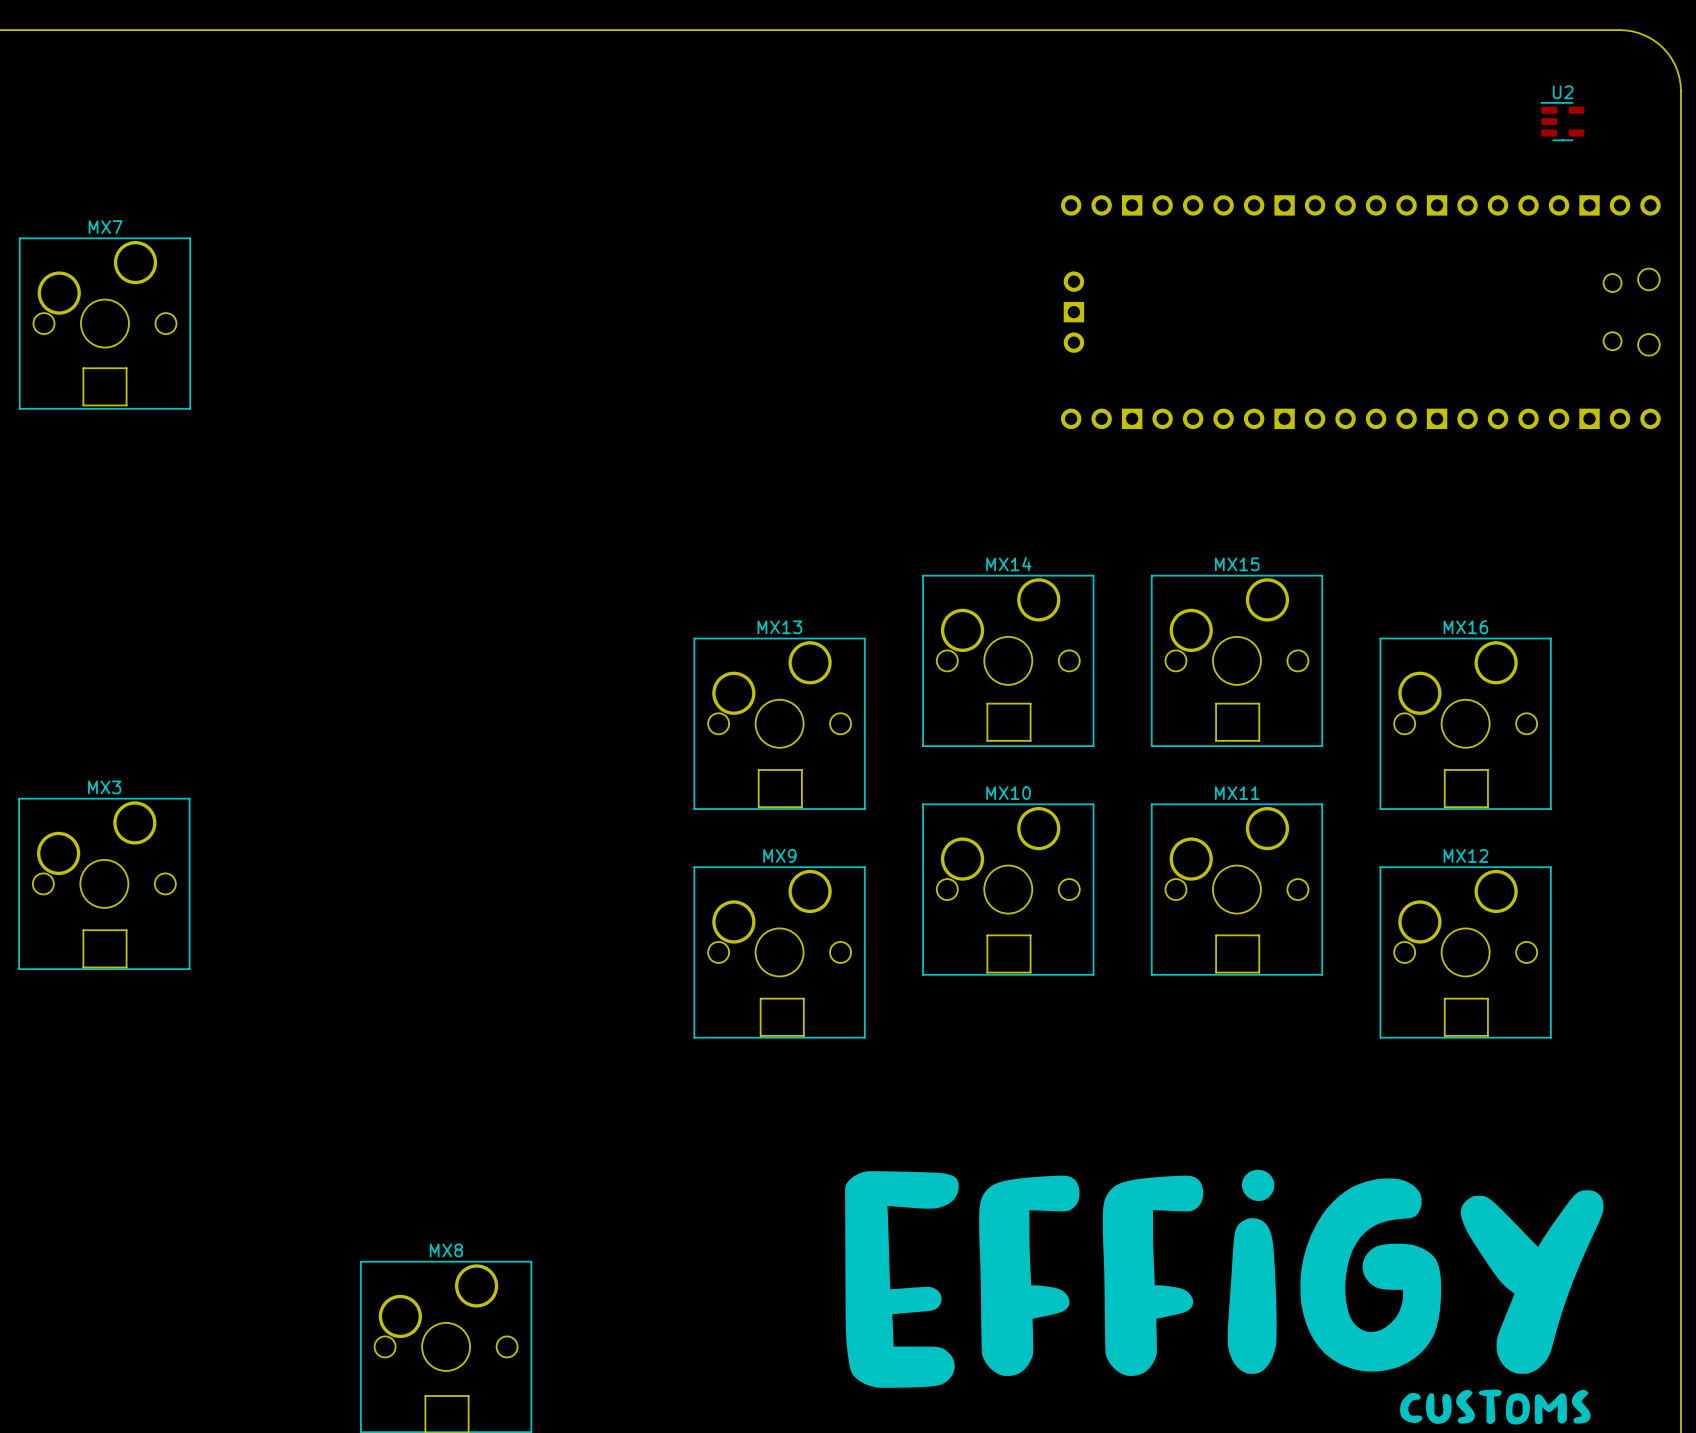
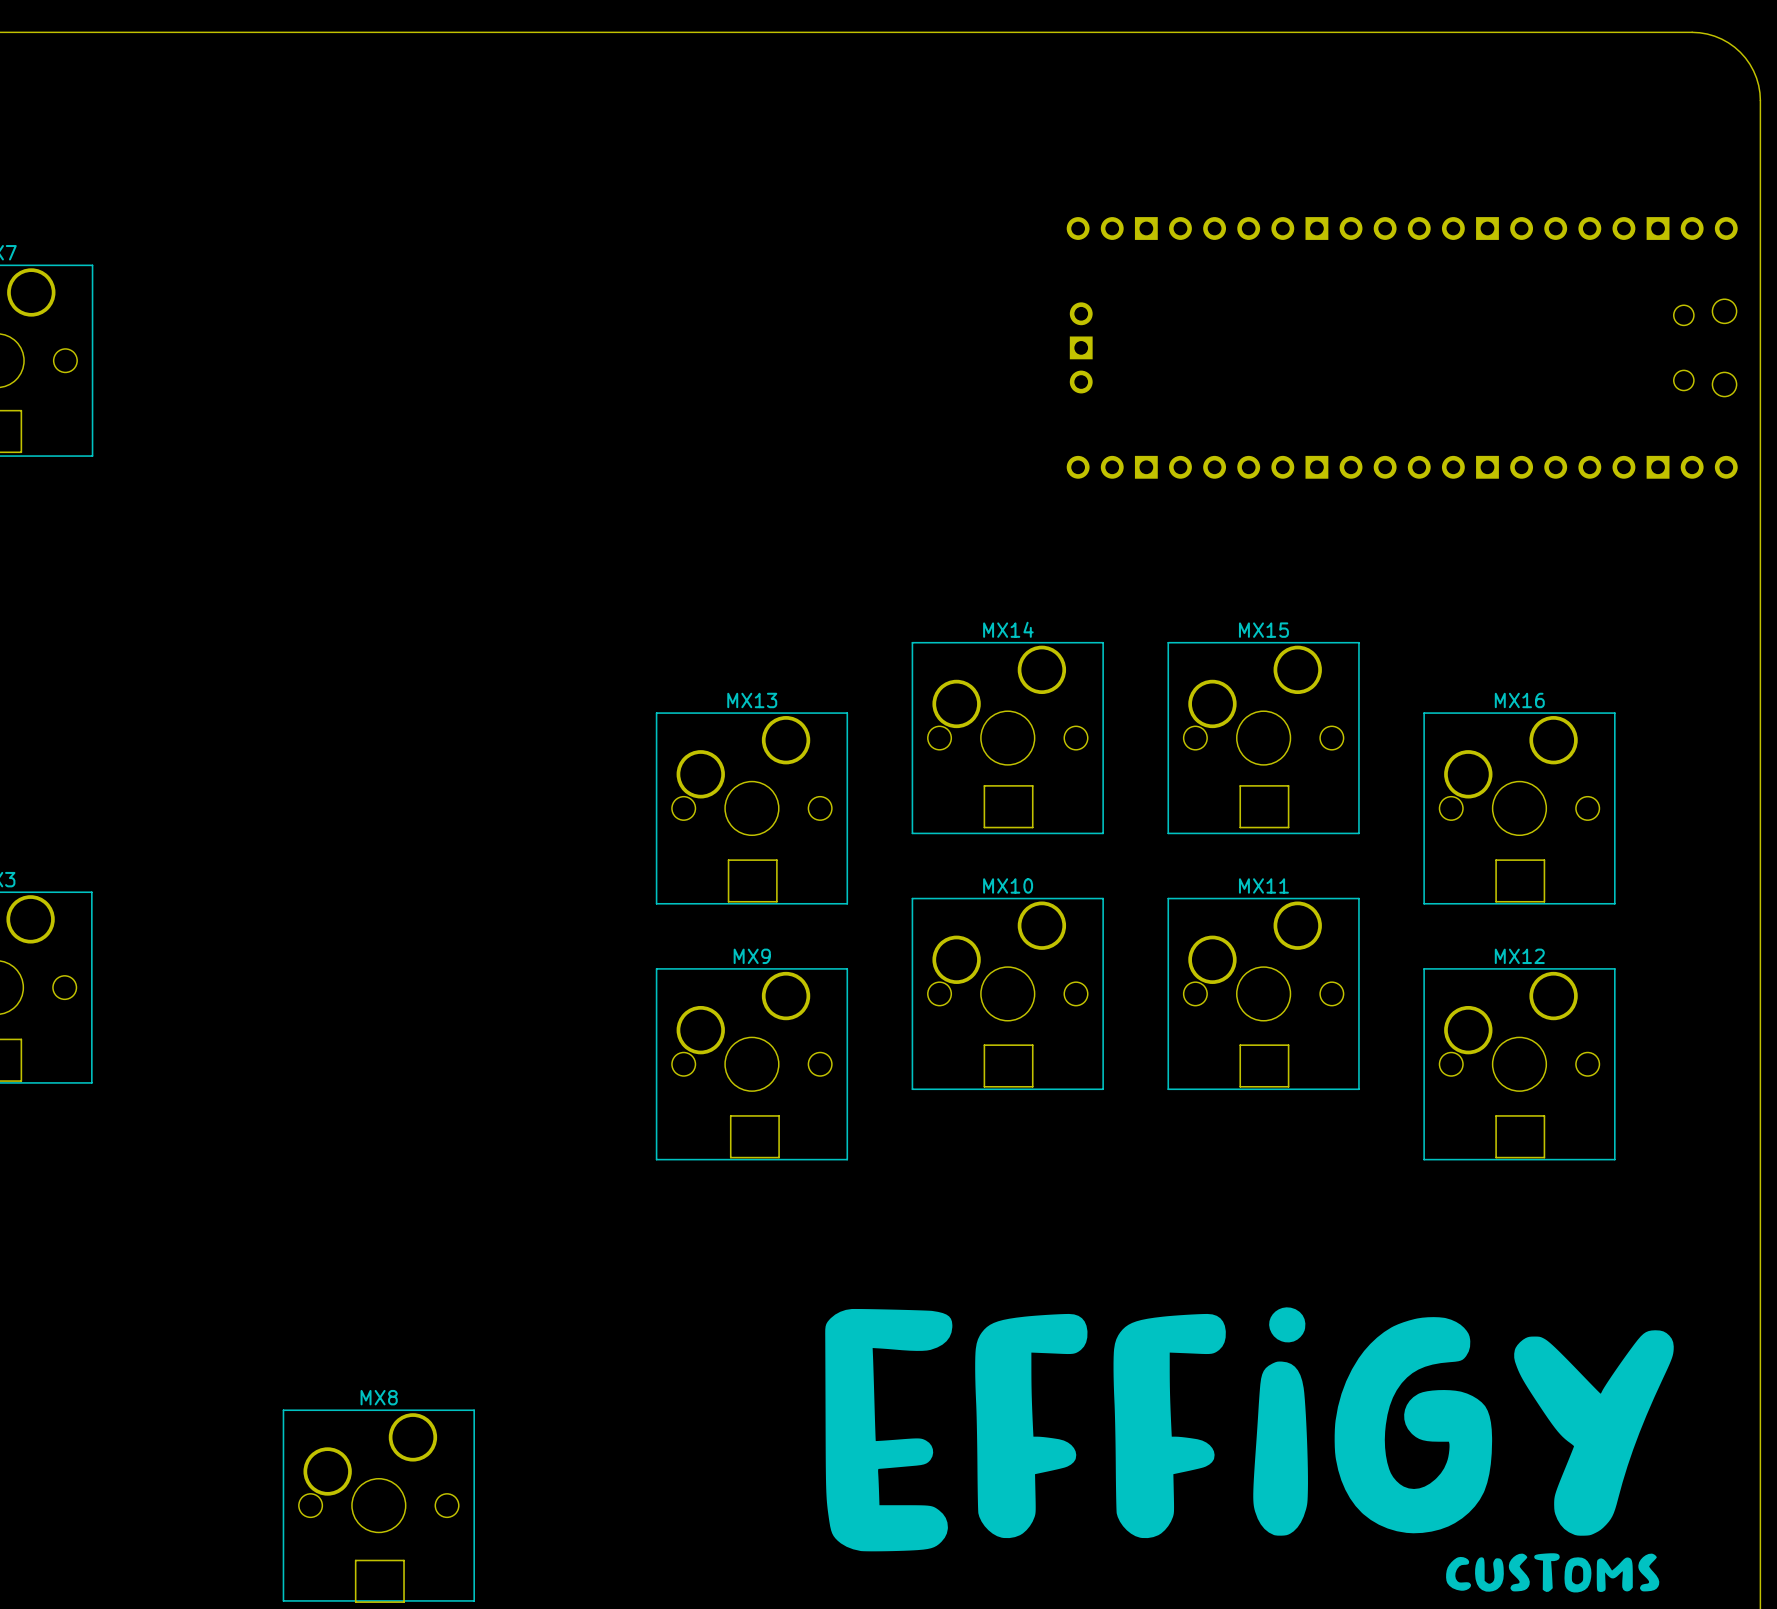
U2: (1562, 121) -> none

